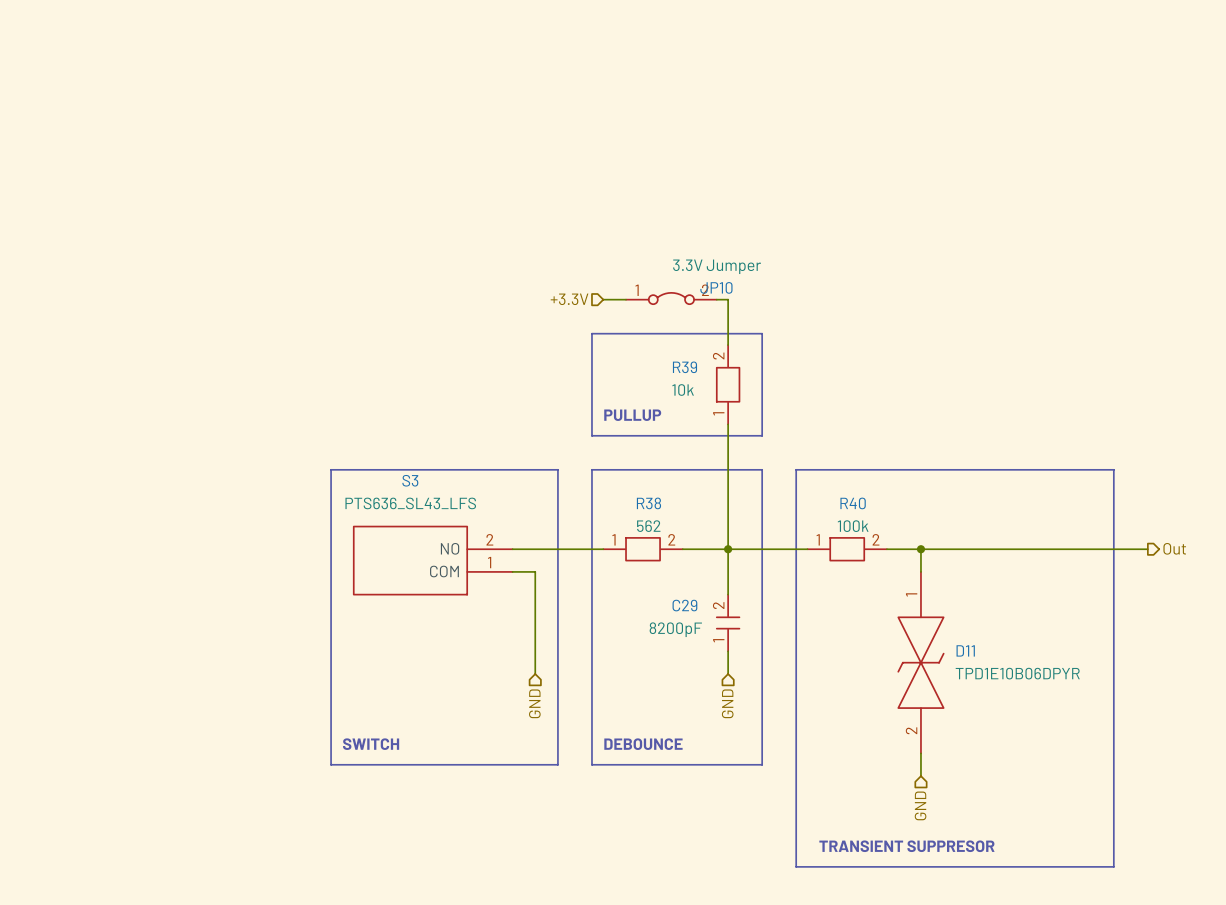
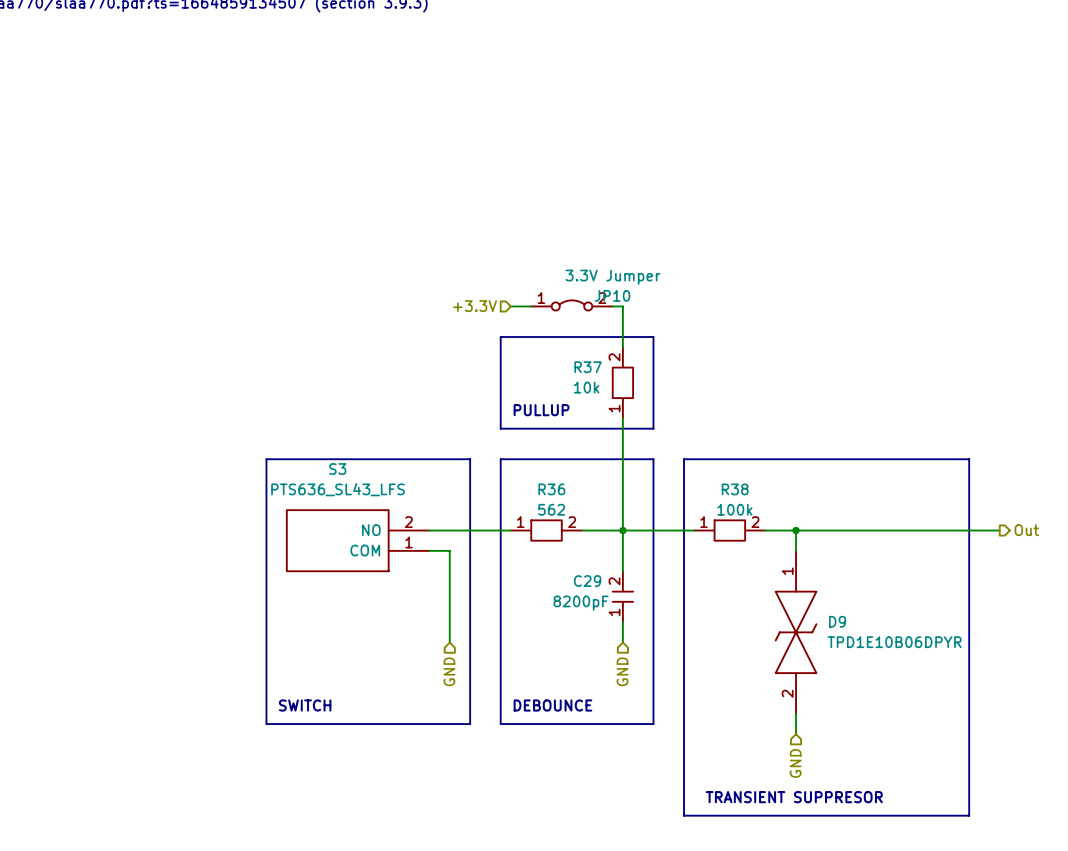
R39 name: R39 (684, 367) -> R37 (588, 367)
R38 name: R38 (648, 503) -> R36 (551, 489)
R40 name: R40 (853, 503) -> R38 (735, 489)
D11 name: D11 (965, 650) -> D9 (837, 621)

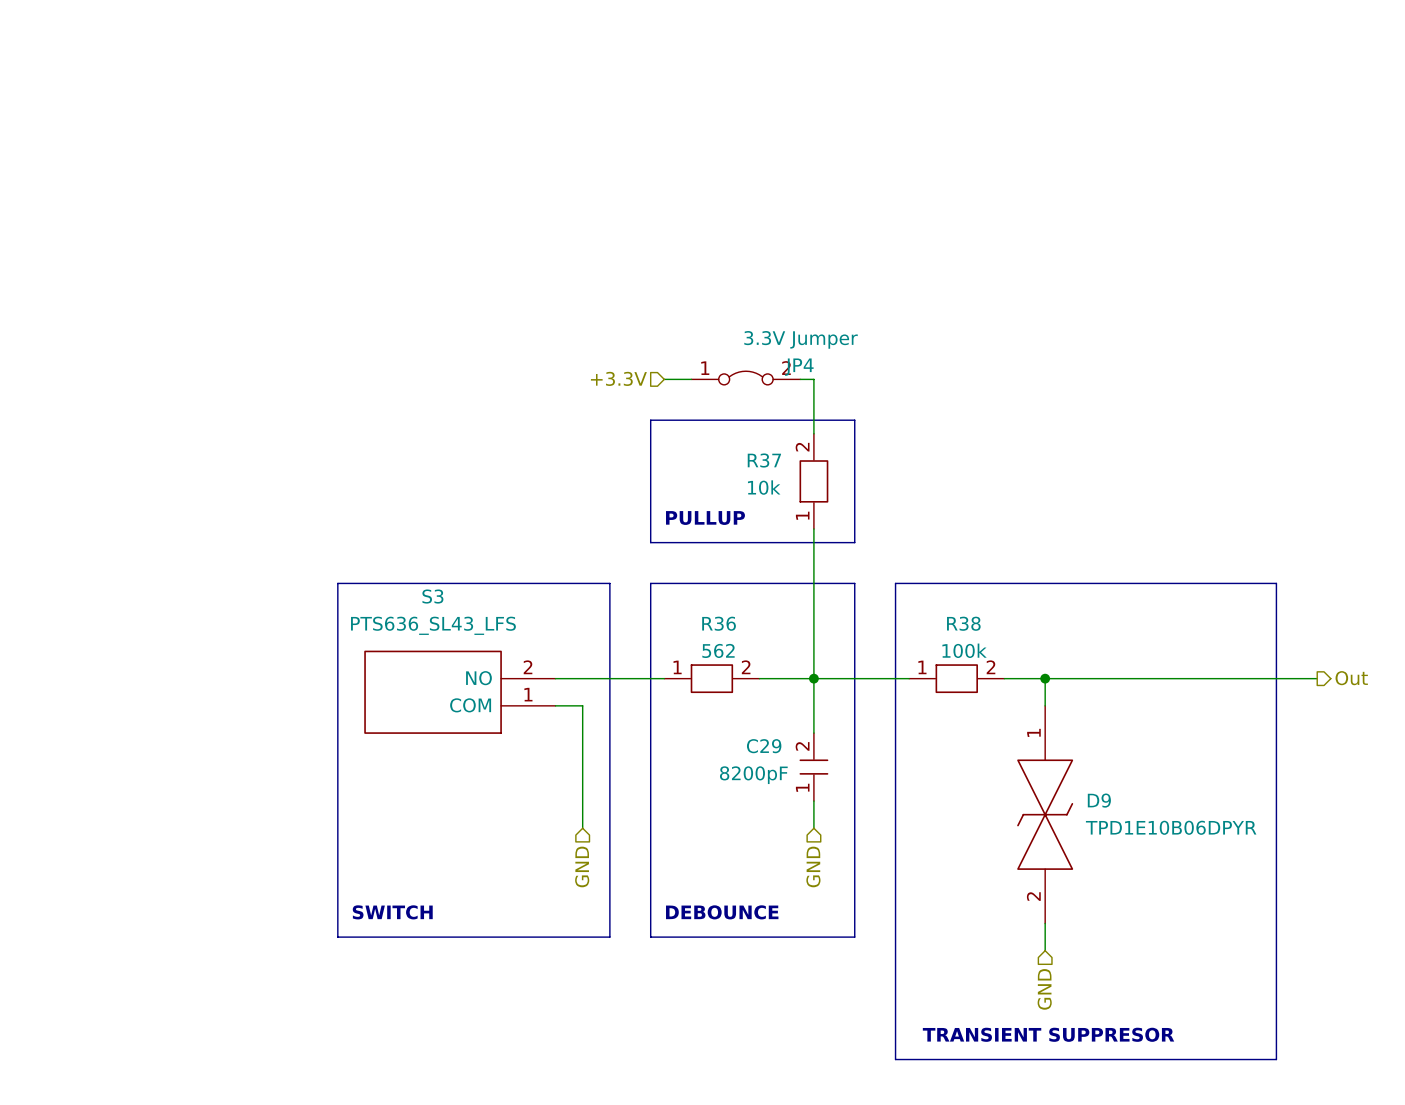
JP10 name: JP10 (612, 295) -> JP4 (799, 367)

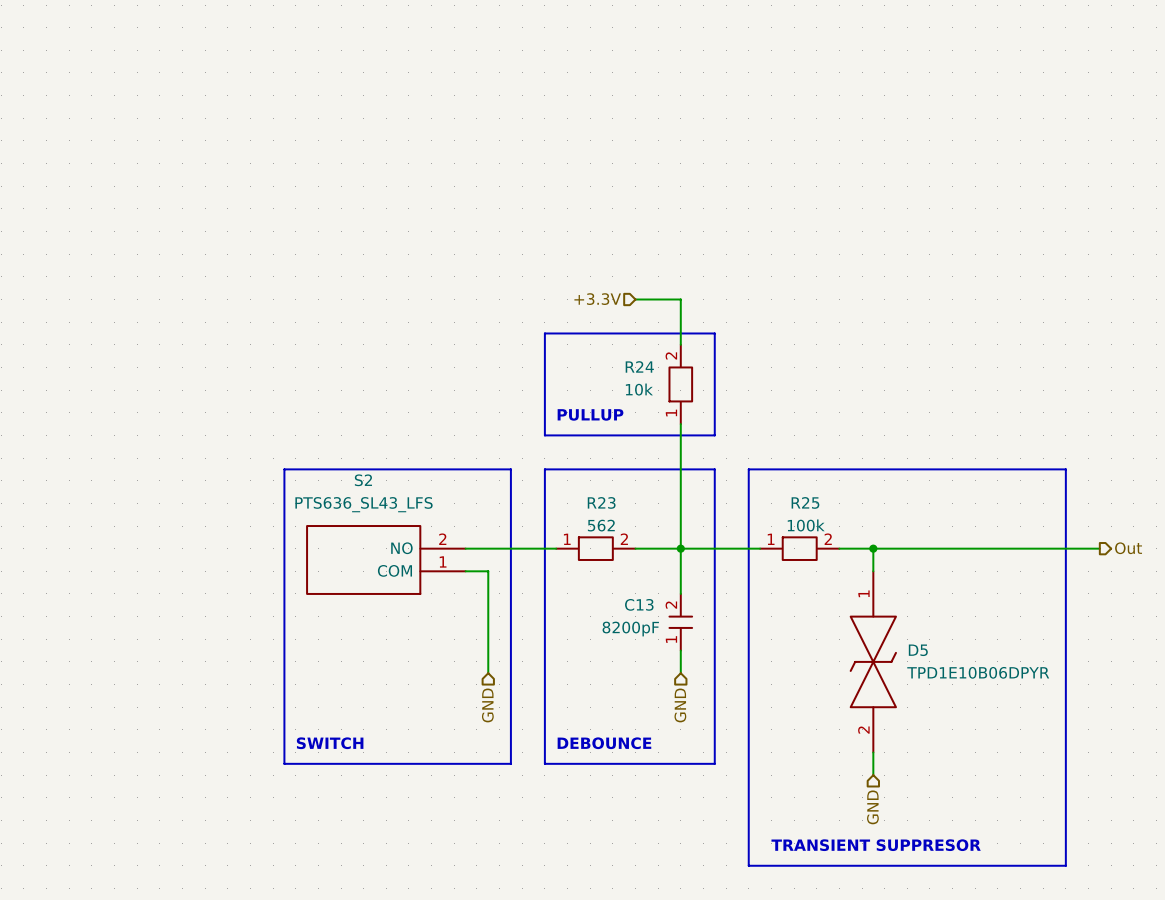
hierarchical label position: +3.3V (618, 378) -> +3.3V (597, 299)
JP4: 3.3V Jumper (745, 378) -> none
wire: (664, 379) (691, 379) -> none
R37 name: R37 (764, 460) -> R24 (639, 366)
S3 name: S3 (432, 596) -> S2 (363, 480)
R36 name: R36 (719, 623) -> R23 (601, 502)
R38 name: R38 (963, 623) -> R25 (805, 502)
C29 name: C29 (764, 746) -> C13 (639, 604)
D9 name: D9 (1099, 800) -> D5 (918, 650)

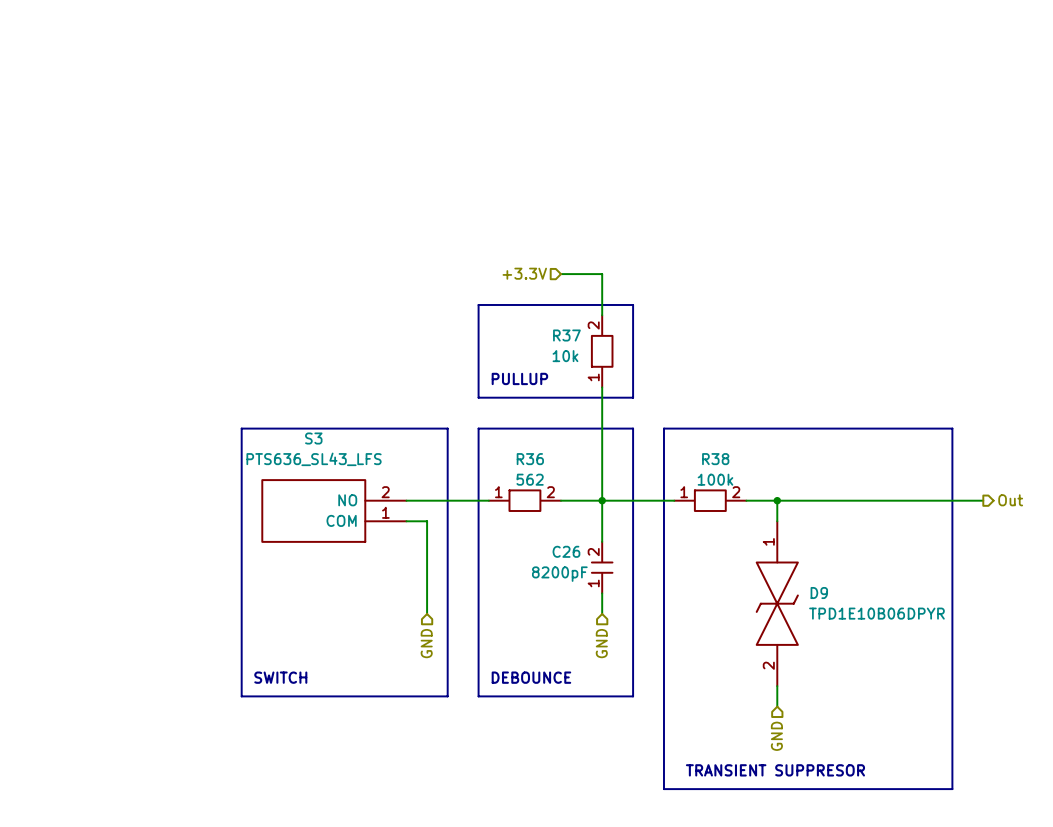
R24 name: R24 (639, 366) -> R37 (566, 335)
S2 name: S2 (363, 480) -> S3 (313, 438)
R23 name: R23 (601, 502) -> R36 (530, 459)
R25 name: R25 (805, 502) -> R38 (715, 459)
C13 name: C13 (639, 604) -> C26 (566, 551)
D5 name: D5 (918, 650) -> D9 (819, 593)

